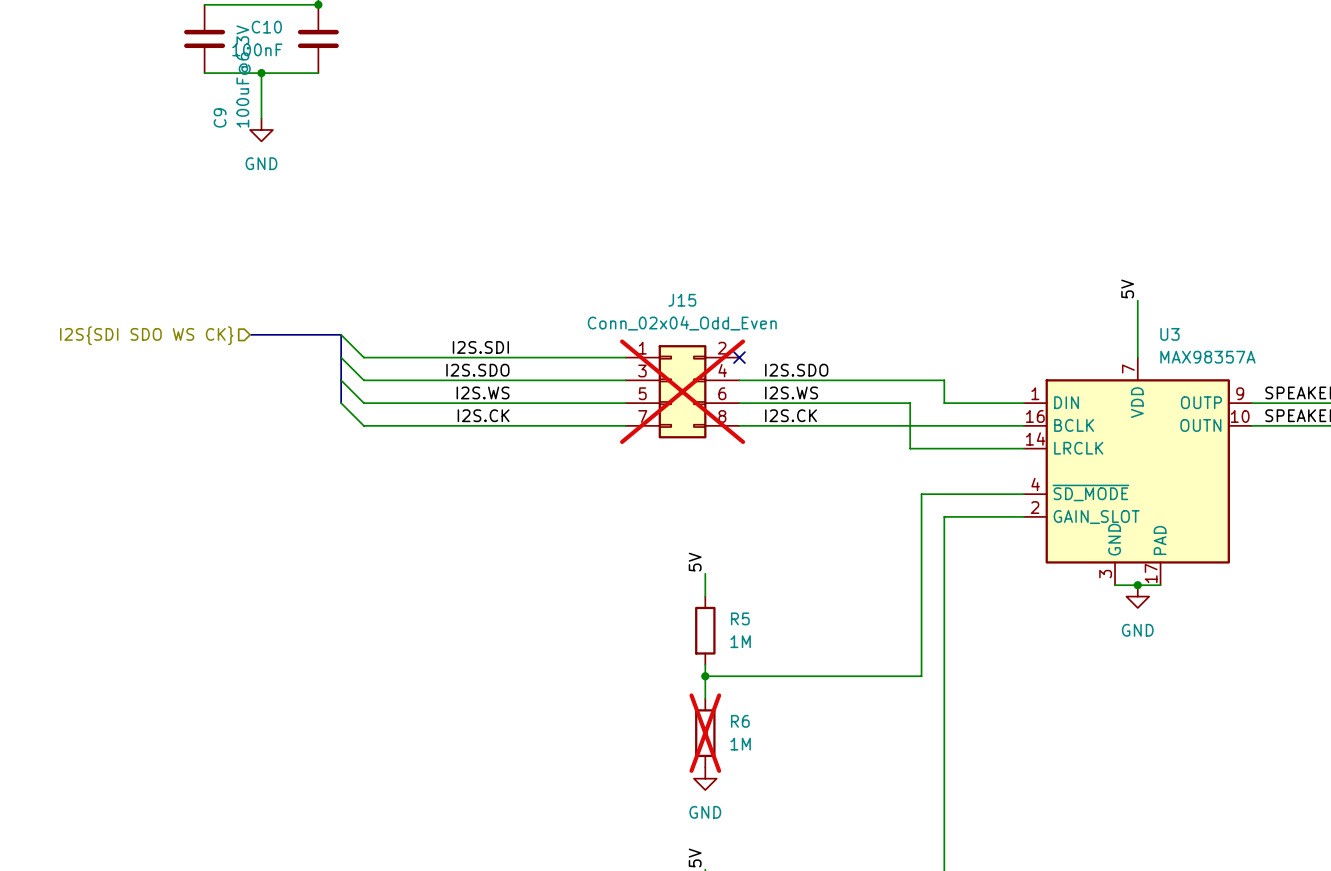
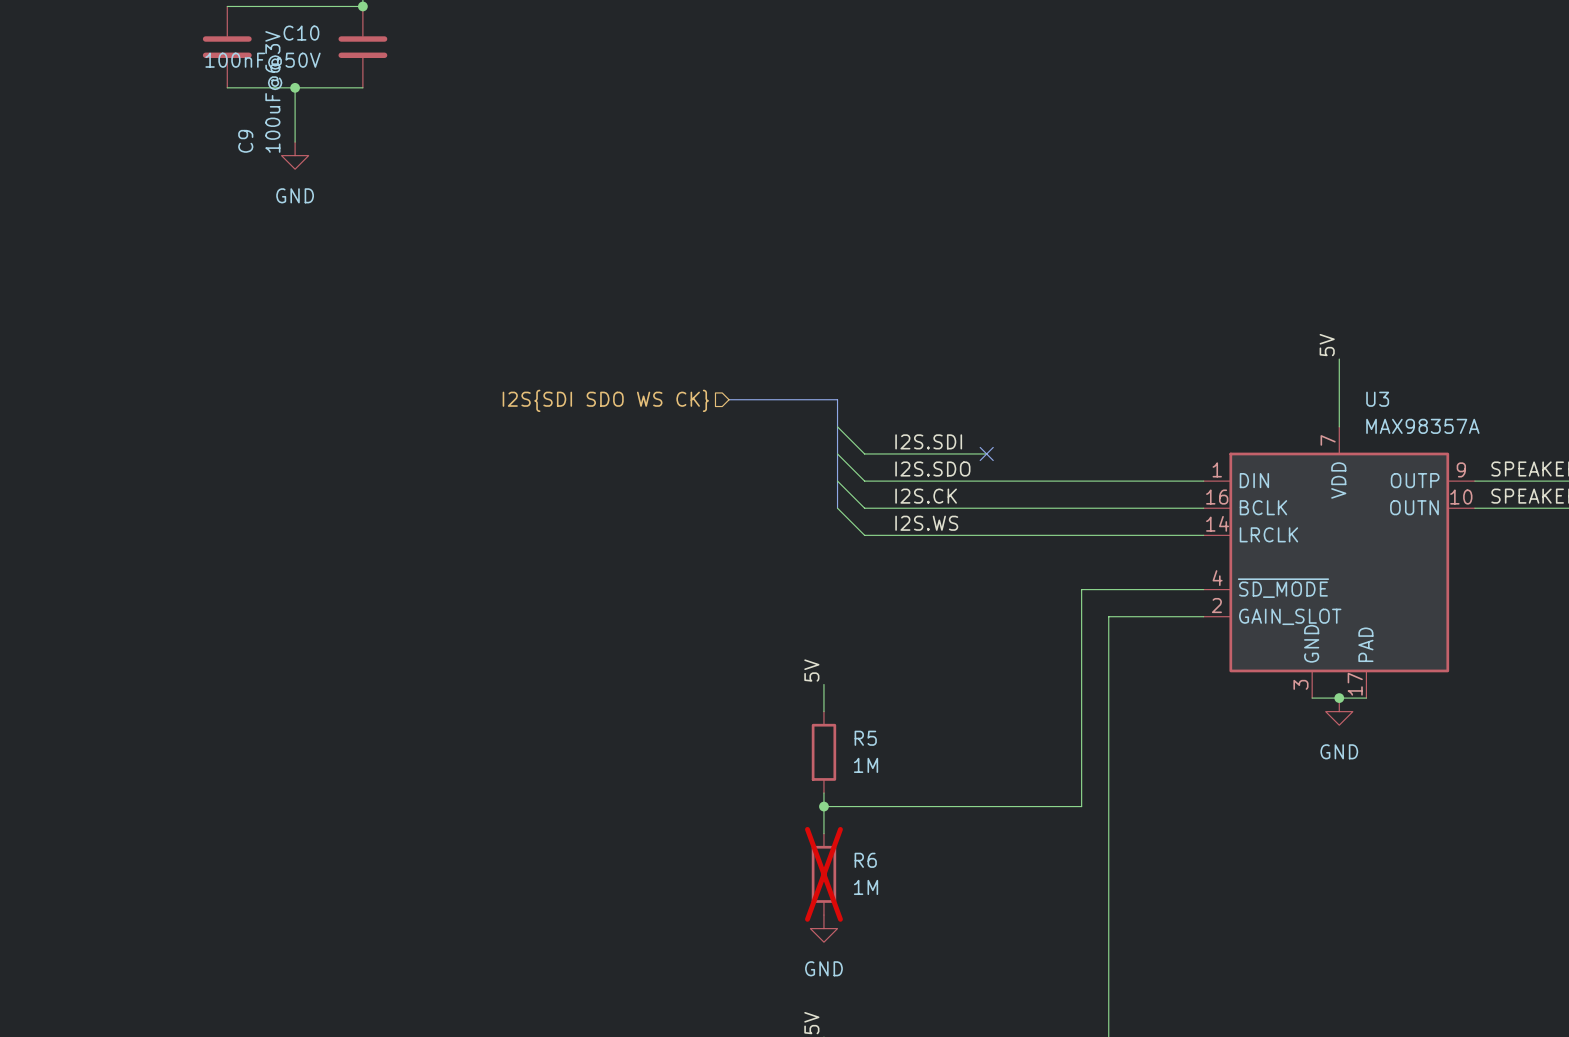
C10 value: 100nF (257, 49) -> 100nF@50V (263, 61)
bus: (250, 334) (341, 334) (341, 403) -> none
wire: (341, 334) (363, 357) (625, 357) -> none
bus: none -> (729, 399) (837, 399) (837, 508)
hierarchical label: I2S{SDI SDO WS CK} (146, 335) -> none
hierarchical label: none -> I2S{SDI SDO WS CK} (605, 400)
label: I2S.SDI (480, 347) -> none
wire: (341, 357) (363, 380) (625, 380) -> none
wire: none -> (837, 426) (864, 453)
no-connect mark: (739, 357) -> none
label: I2S.SDO (477, 370) -> none
label: I2S.SDO (796, 370) -> I2S.SDI (928, 441)
wire: (341, 380) (363, 403) (625, 403) -> none
wire: none -> (837, 453) (864, 481)
wire: (841, 380) (944, 380) (944, 403) -> none
no-connect mark: none -> (986, 453)
J15: Conn_02x04_Odd_Even (682, 391) -> none
label: I2S.WS (483, 392) -> none
label: I2S.WS (791, 392) -> I2S.SDO (932, 469)
wire: (341, 403) (363, 425) (625, 425) -> none
wire: none -> (837, 481) (864, 508)
wire: (910, 403) (910, 448) -> (1068, 481) (1108, 481)
label: I2S.CK (483, 415) -> none
wire: none -> (837, 508) (864, 535) (1068, 535)
label: none -> I2S.WS (926, 523)

